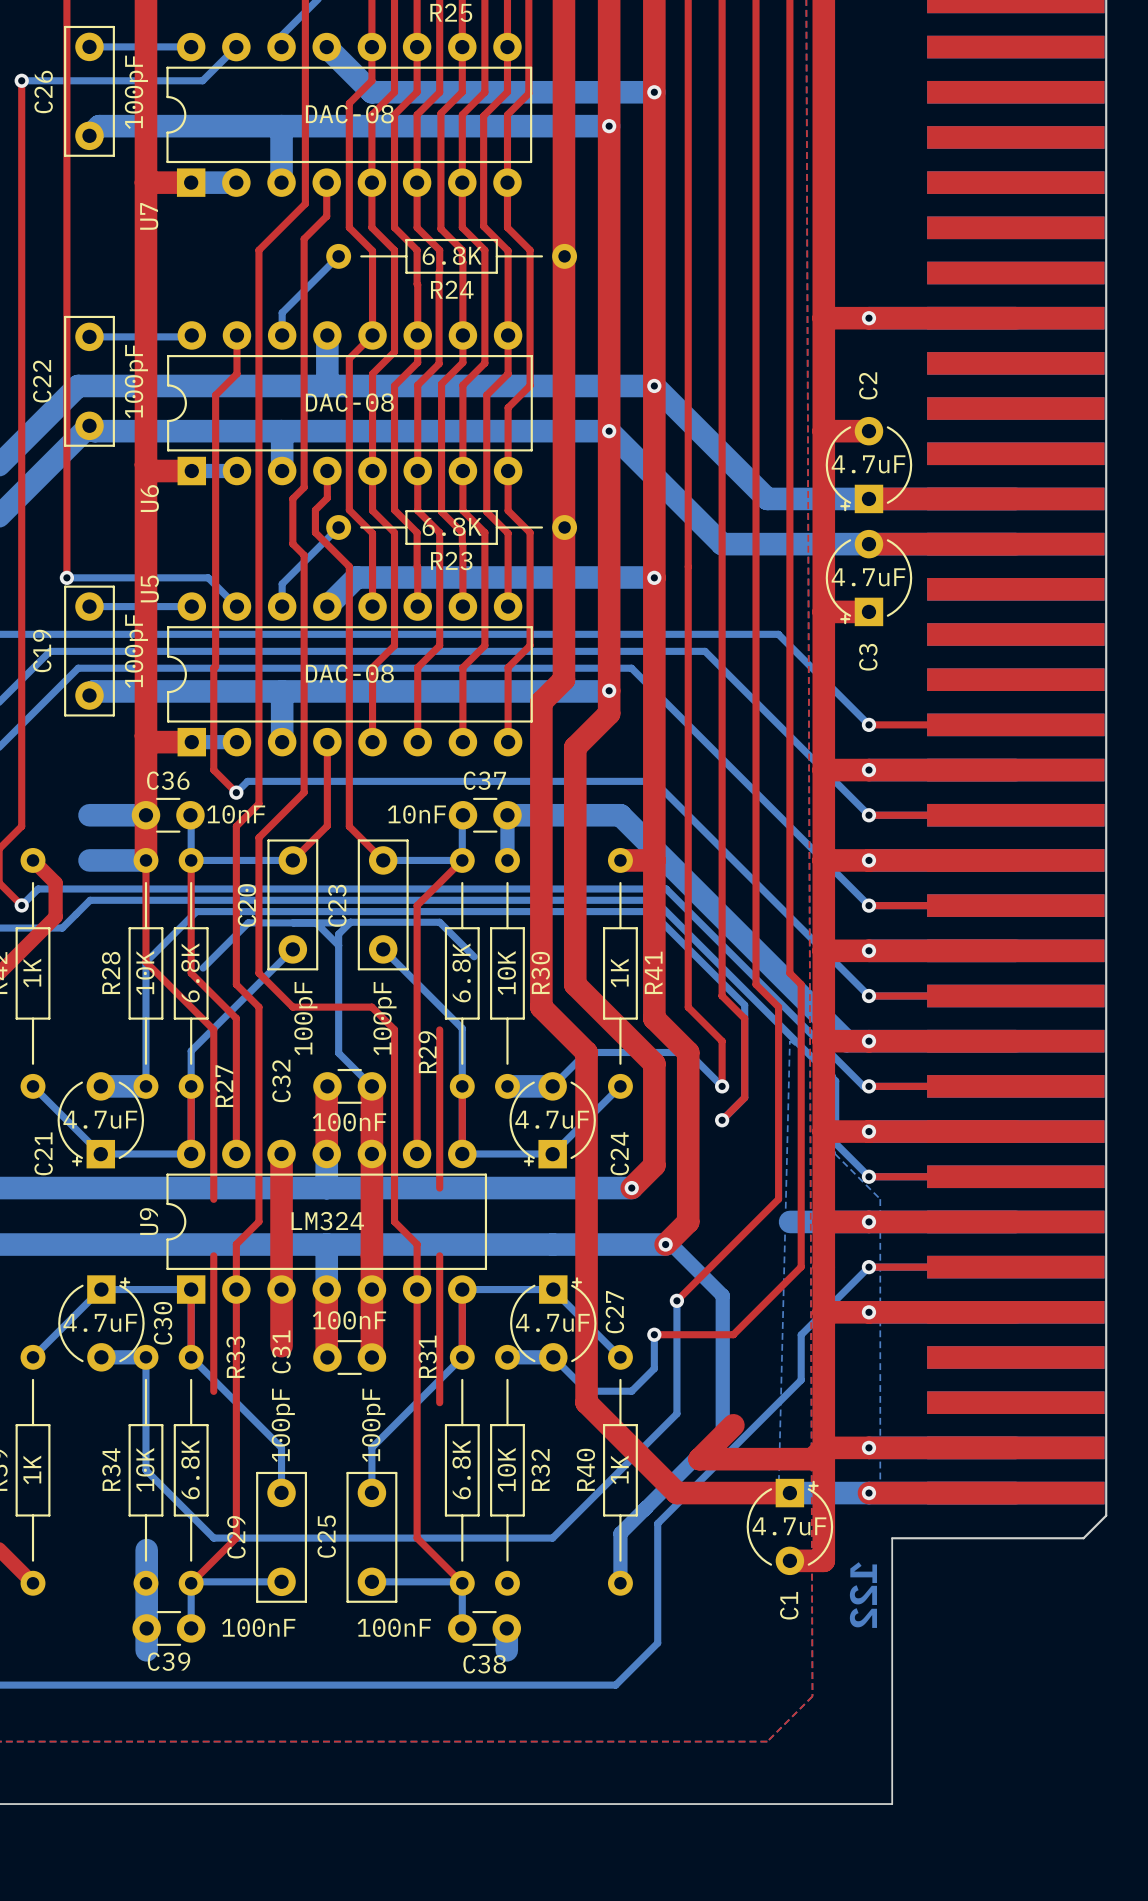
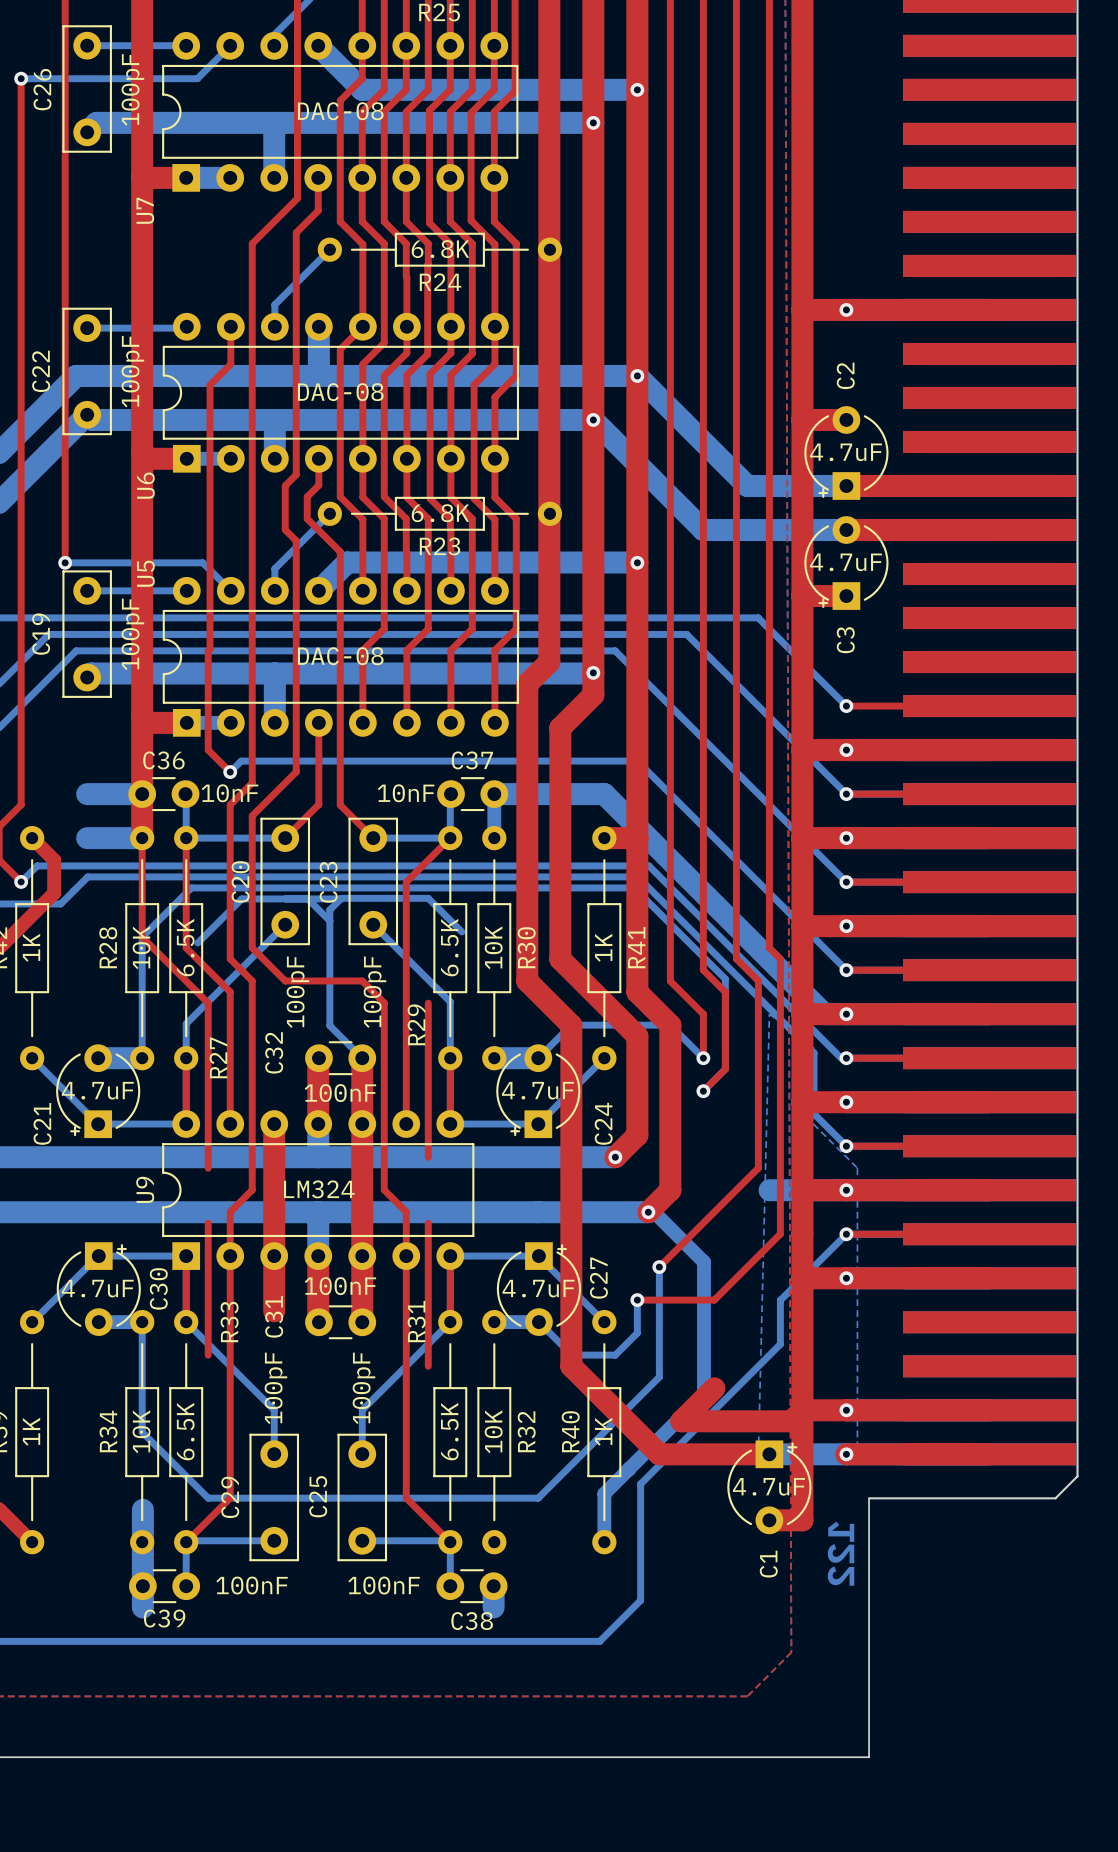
R27 value: 6.8K (190, 972) -> 6.5K (185, 947)
R29 value: 6.8K (461, 972) -> 6.5K (449, 947)
R33 value: 6.8K (190, 1469) -> 6.5K (185, 1431)
R31 value: 6.8K (461, 1469) -> 6.5K (449, 1431)

